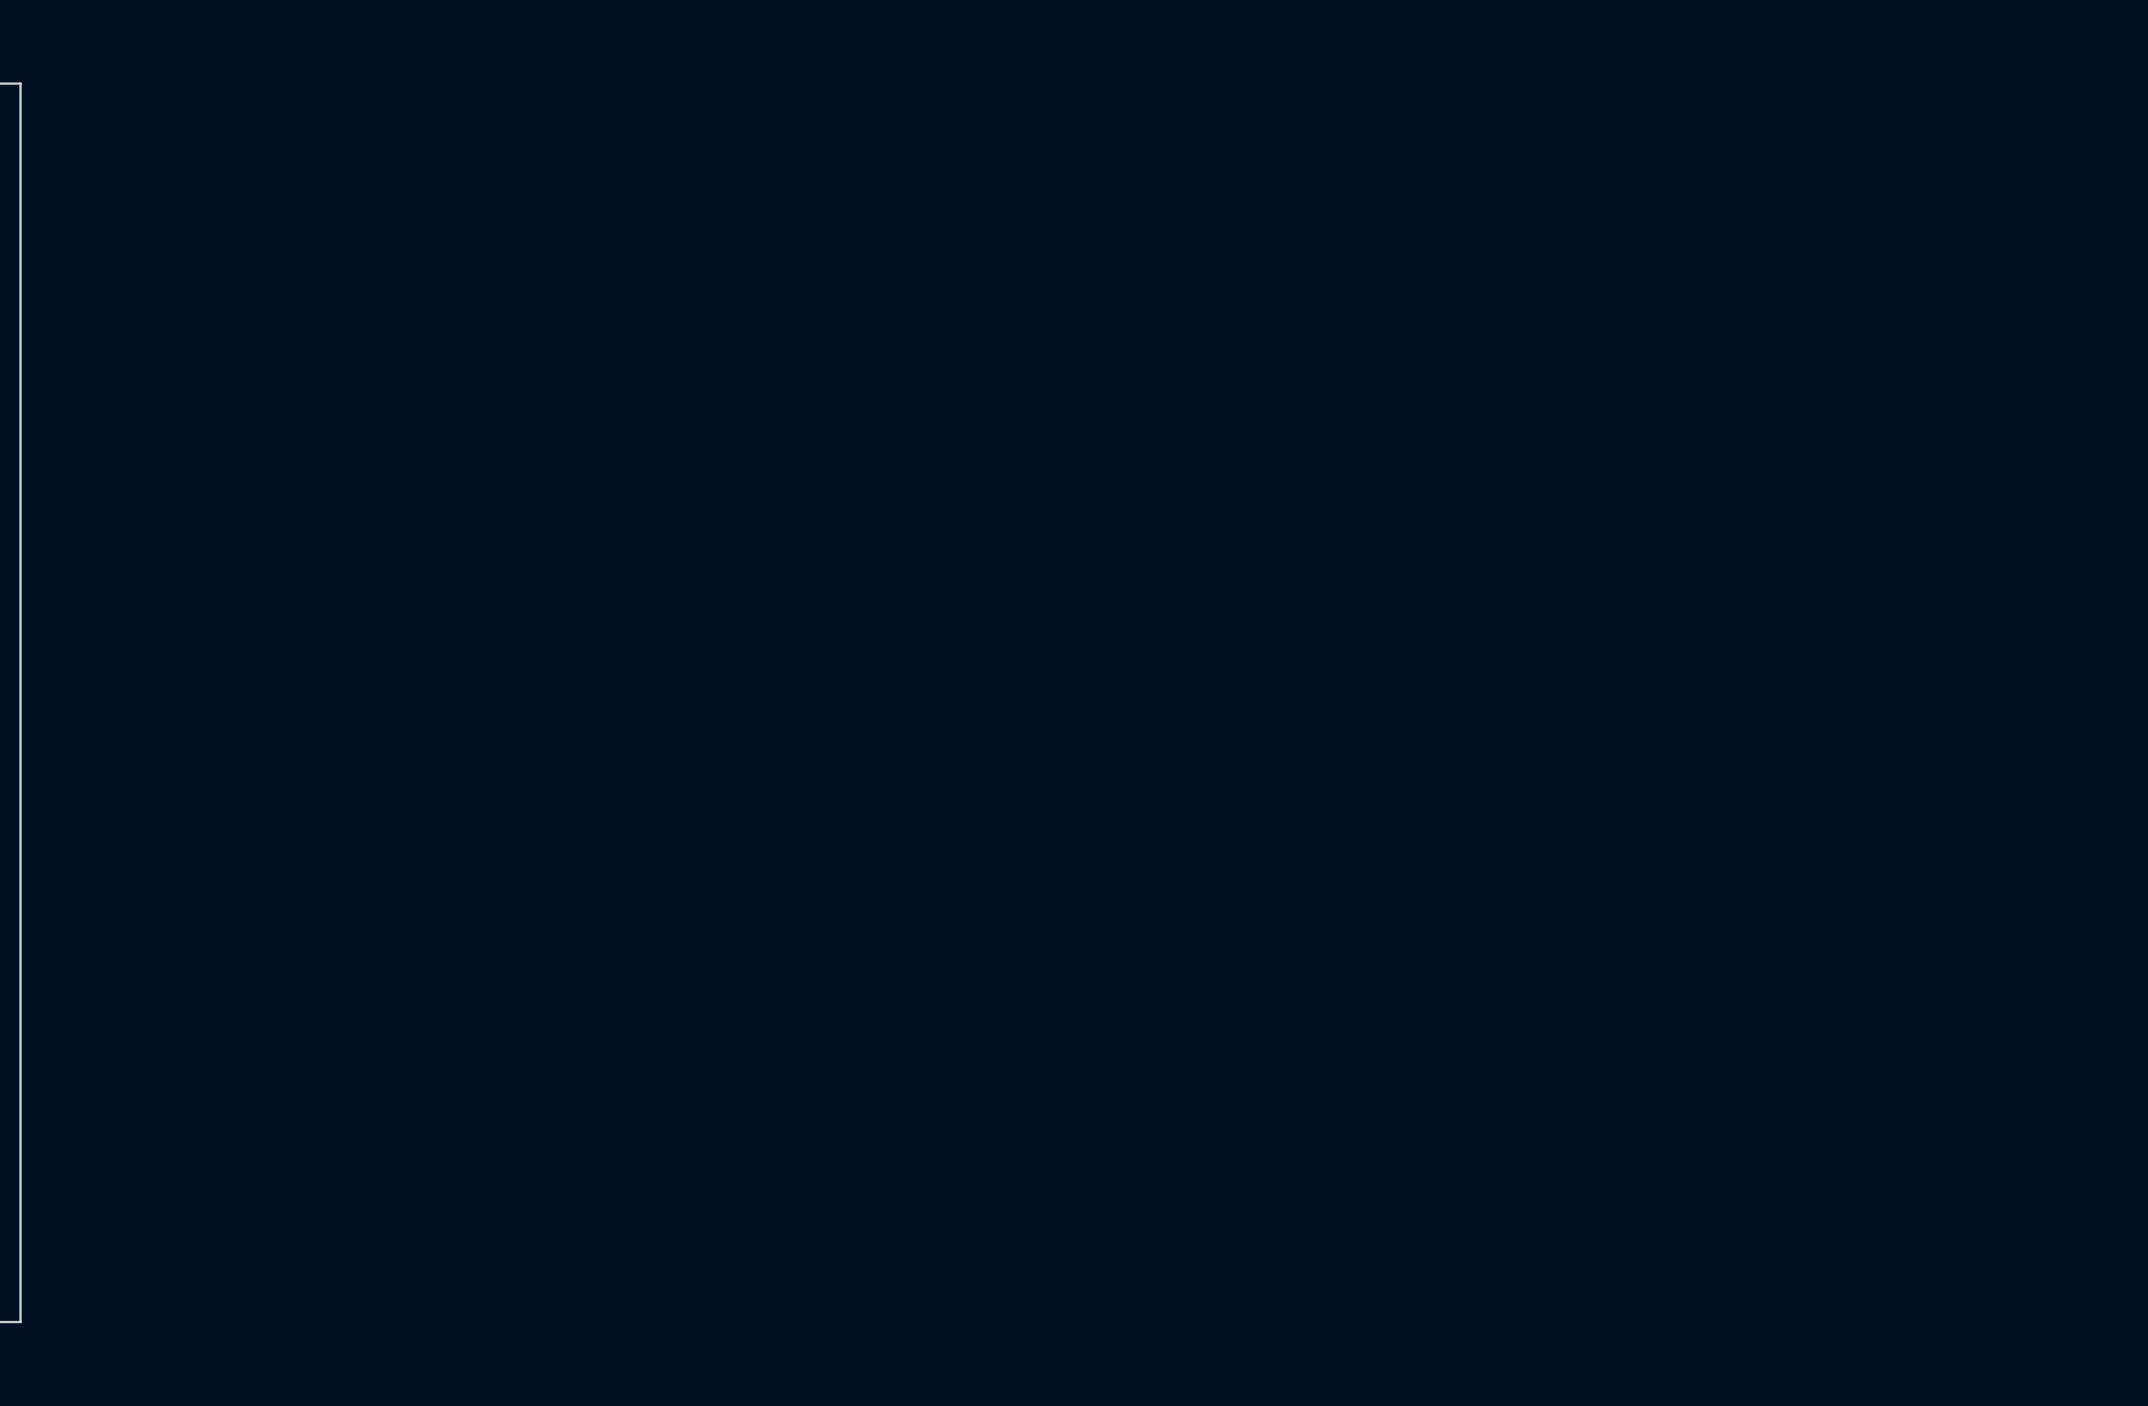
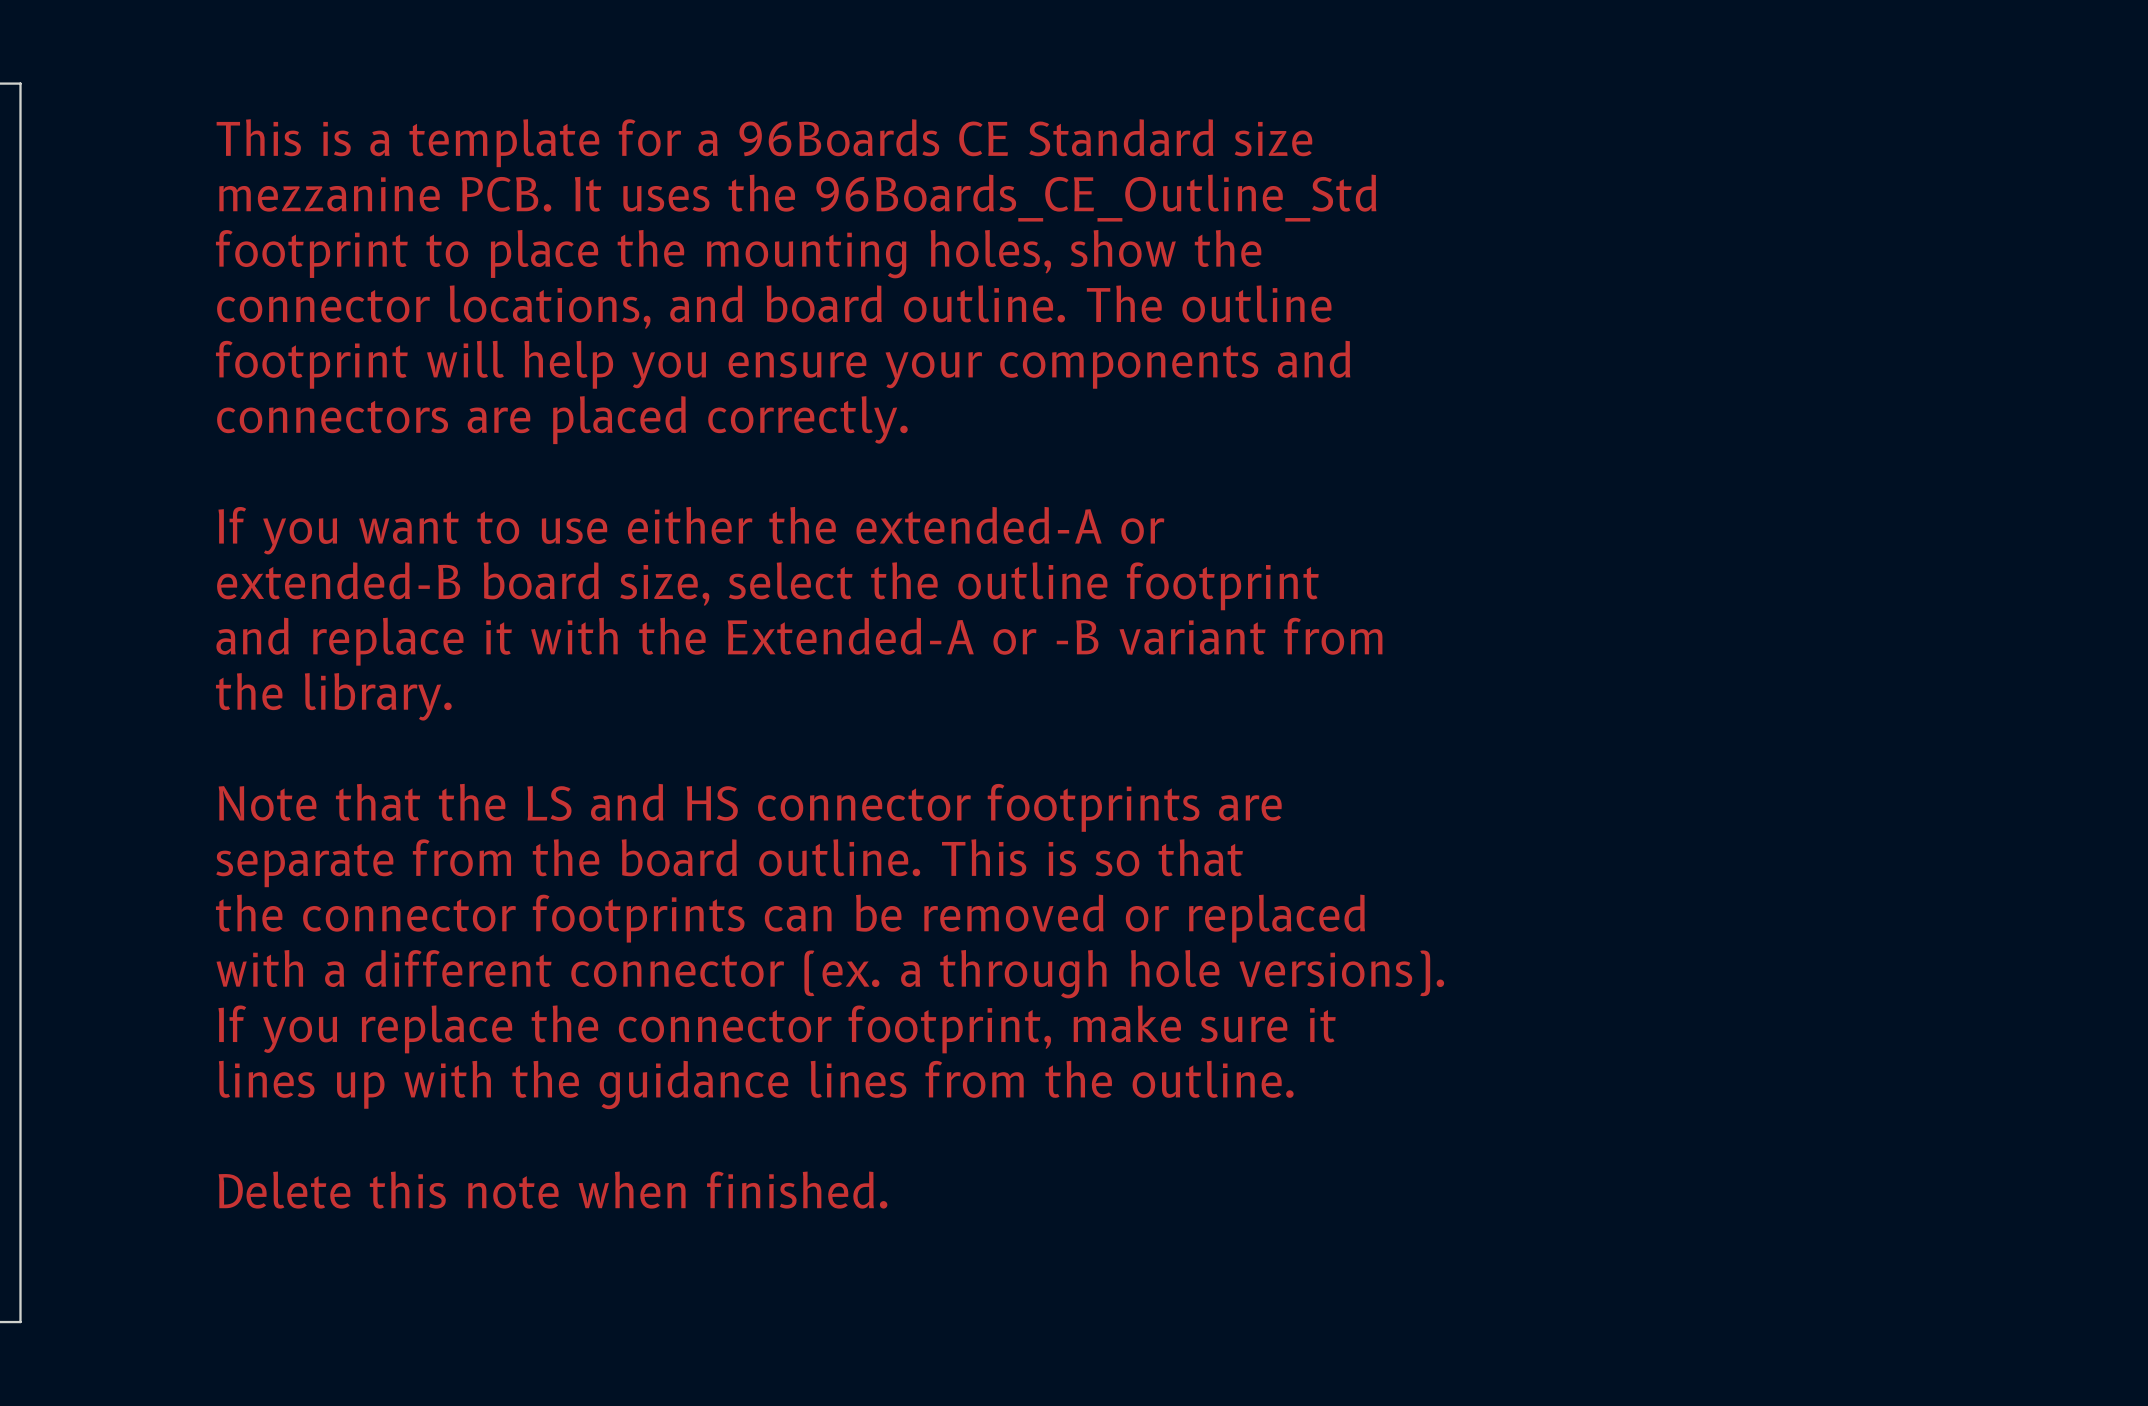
text: none -> This is a template for a 96Boards CE Standard size (764, 143)
text: none -> mezzanine PCB. It uses the 96Boards_CE_Outline_Std (797, 198)
text: none -> footprint to place the mounting holes, show the (738, 254)
text: none -> connector locations, and board outline. The outline (774, 307)
text: none -> footprint will help you ensure your components and (783, 364)
text: none -> connectors are placed correctly. (562, 420)
text: none -> If you want to use either the extended-A or (691, 530)
text: none -> extended-B board size, select the outline footprint (767, 586)
text: none -> and replace it with the Extended-A or -B variant from (799, 641)
text: none -> the library. (333, 696)
text: none -> Note that the LS and HS connector footprints are (750, 807)
text: none -> separate from the board outline. This is so that (729, 863)
text: none -> the connector footprints can be removed or replaced (790, 918)
text: none -> with a different connector (ex. a through hole versions). (830, 974)
text: none -> If you replace the connector footprint, make sure it (777, 1029)
text: none -> lines up with the guidance lines from the outline. (756, 1084)
text: none -> Delete this note when finished. (553, 1190)

